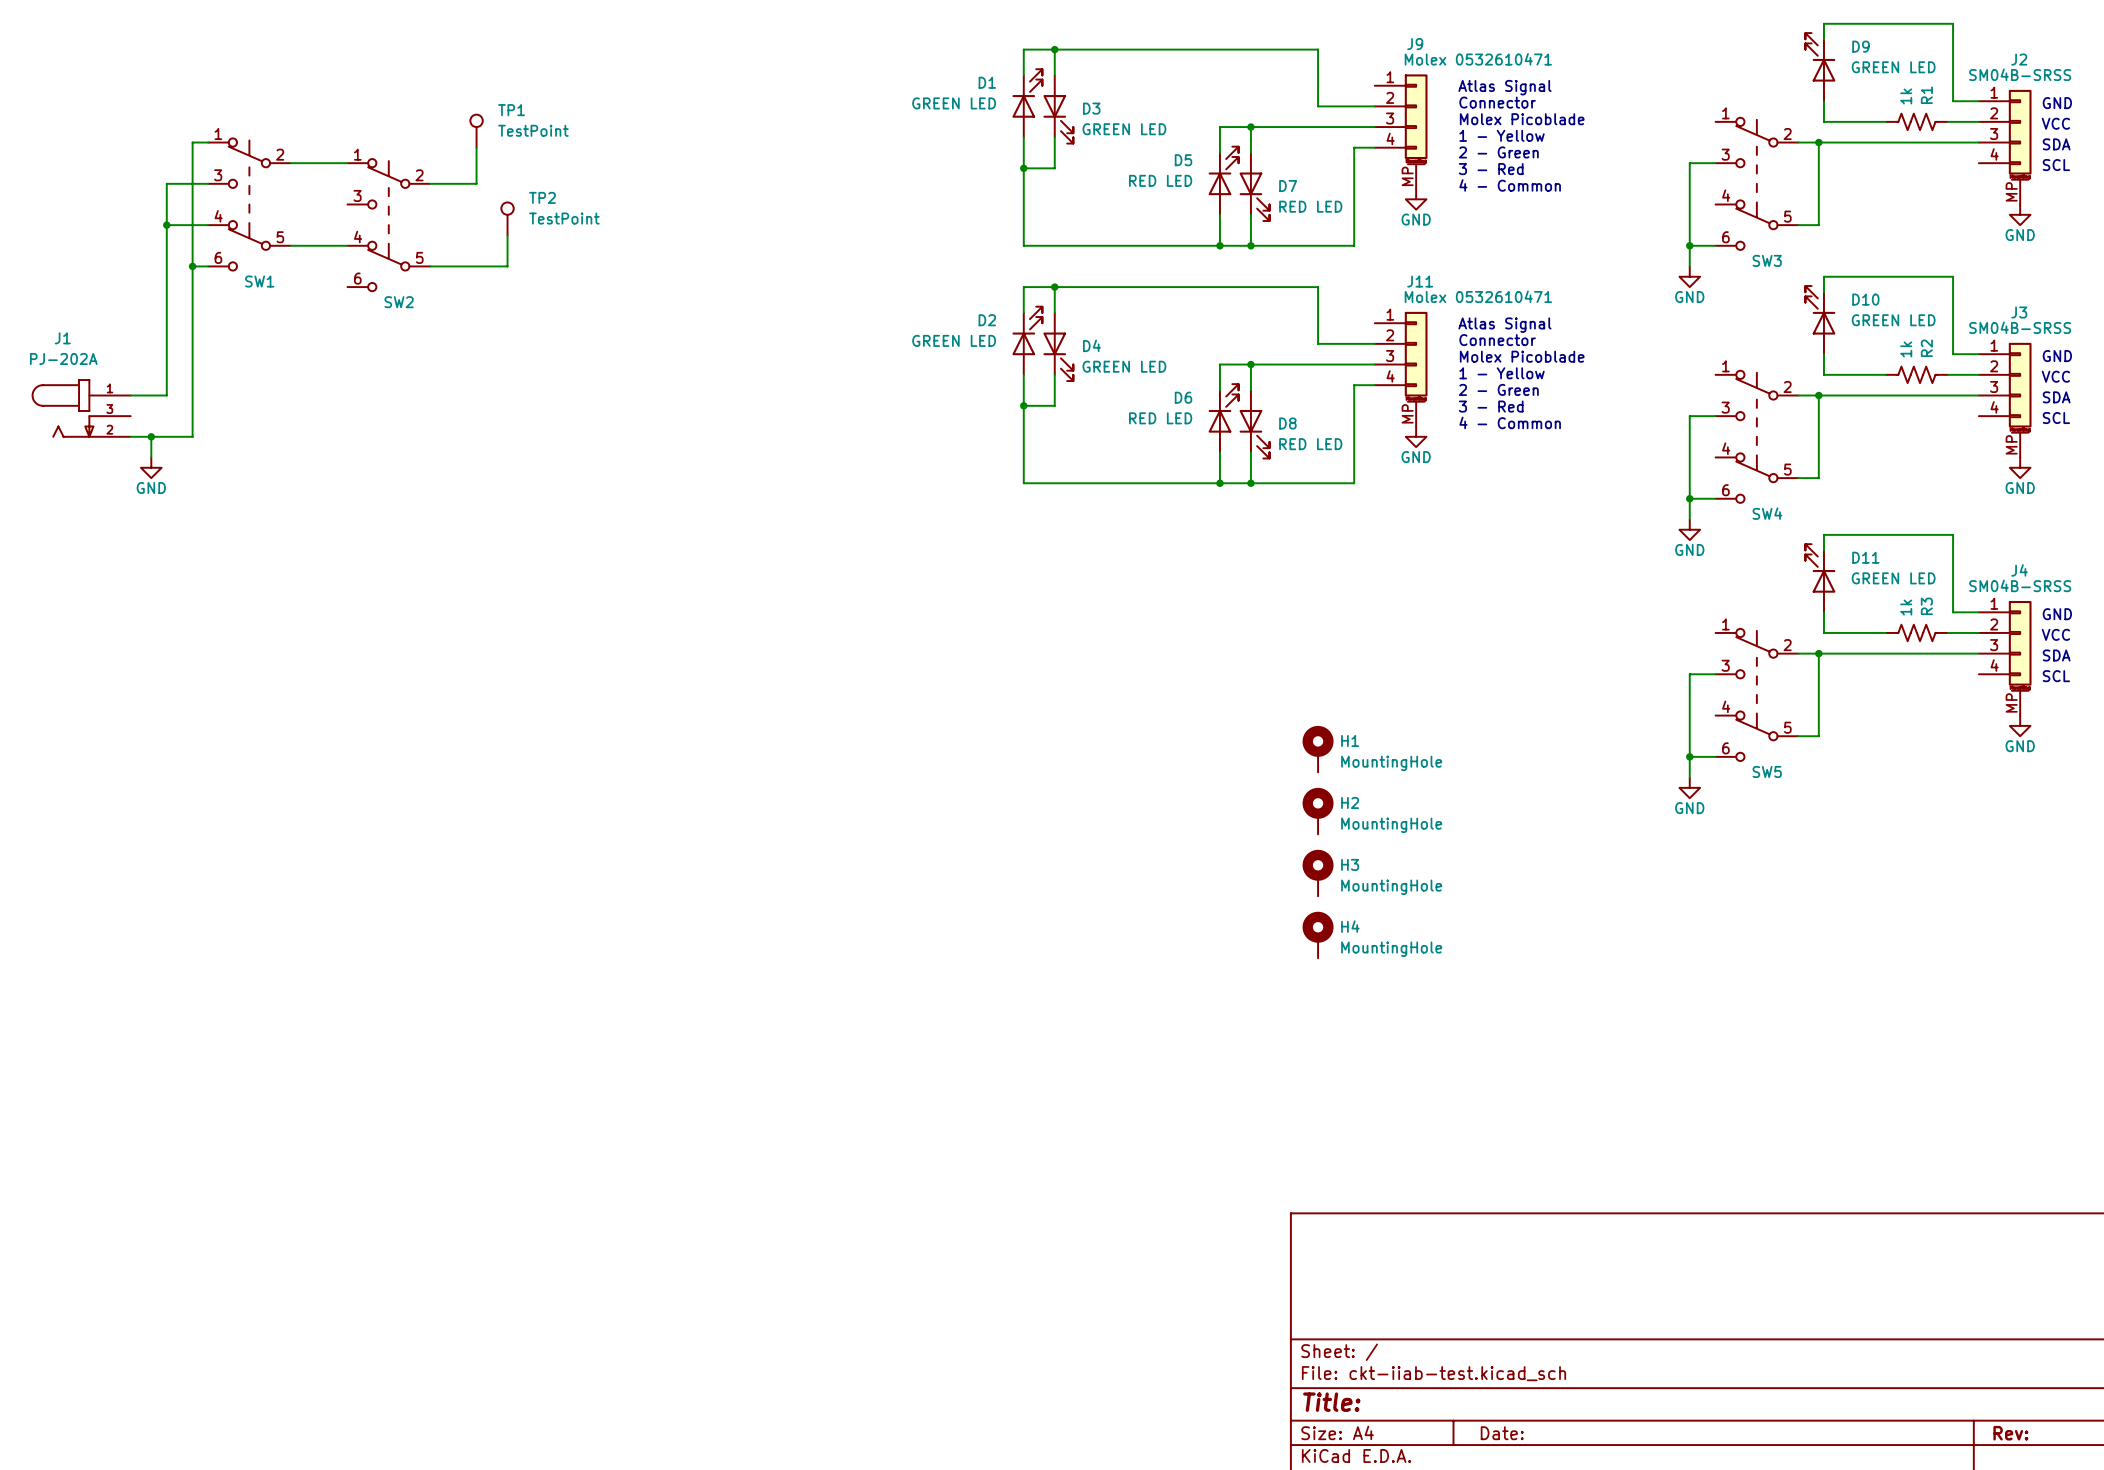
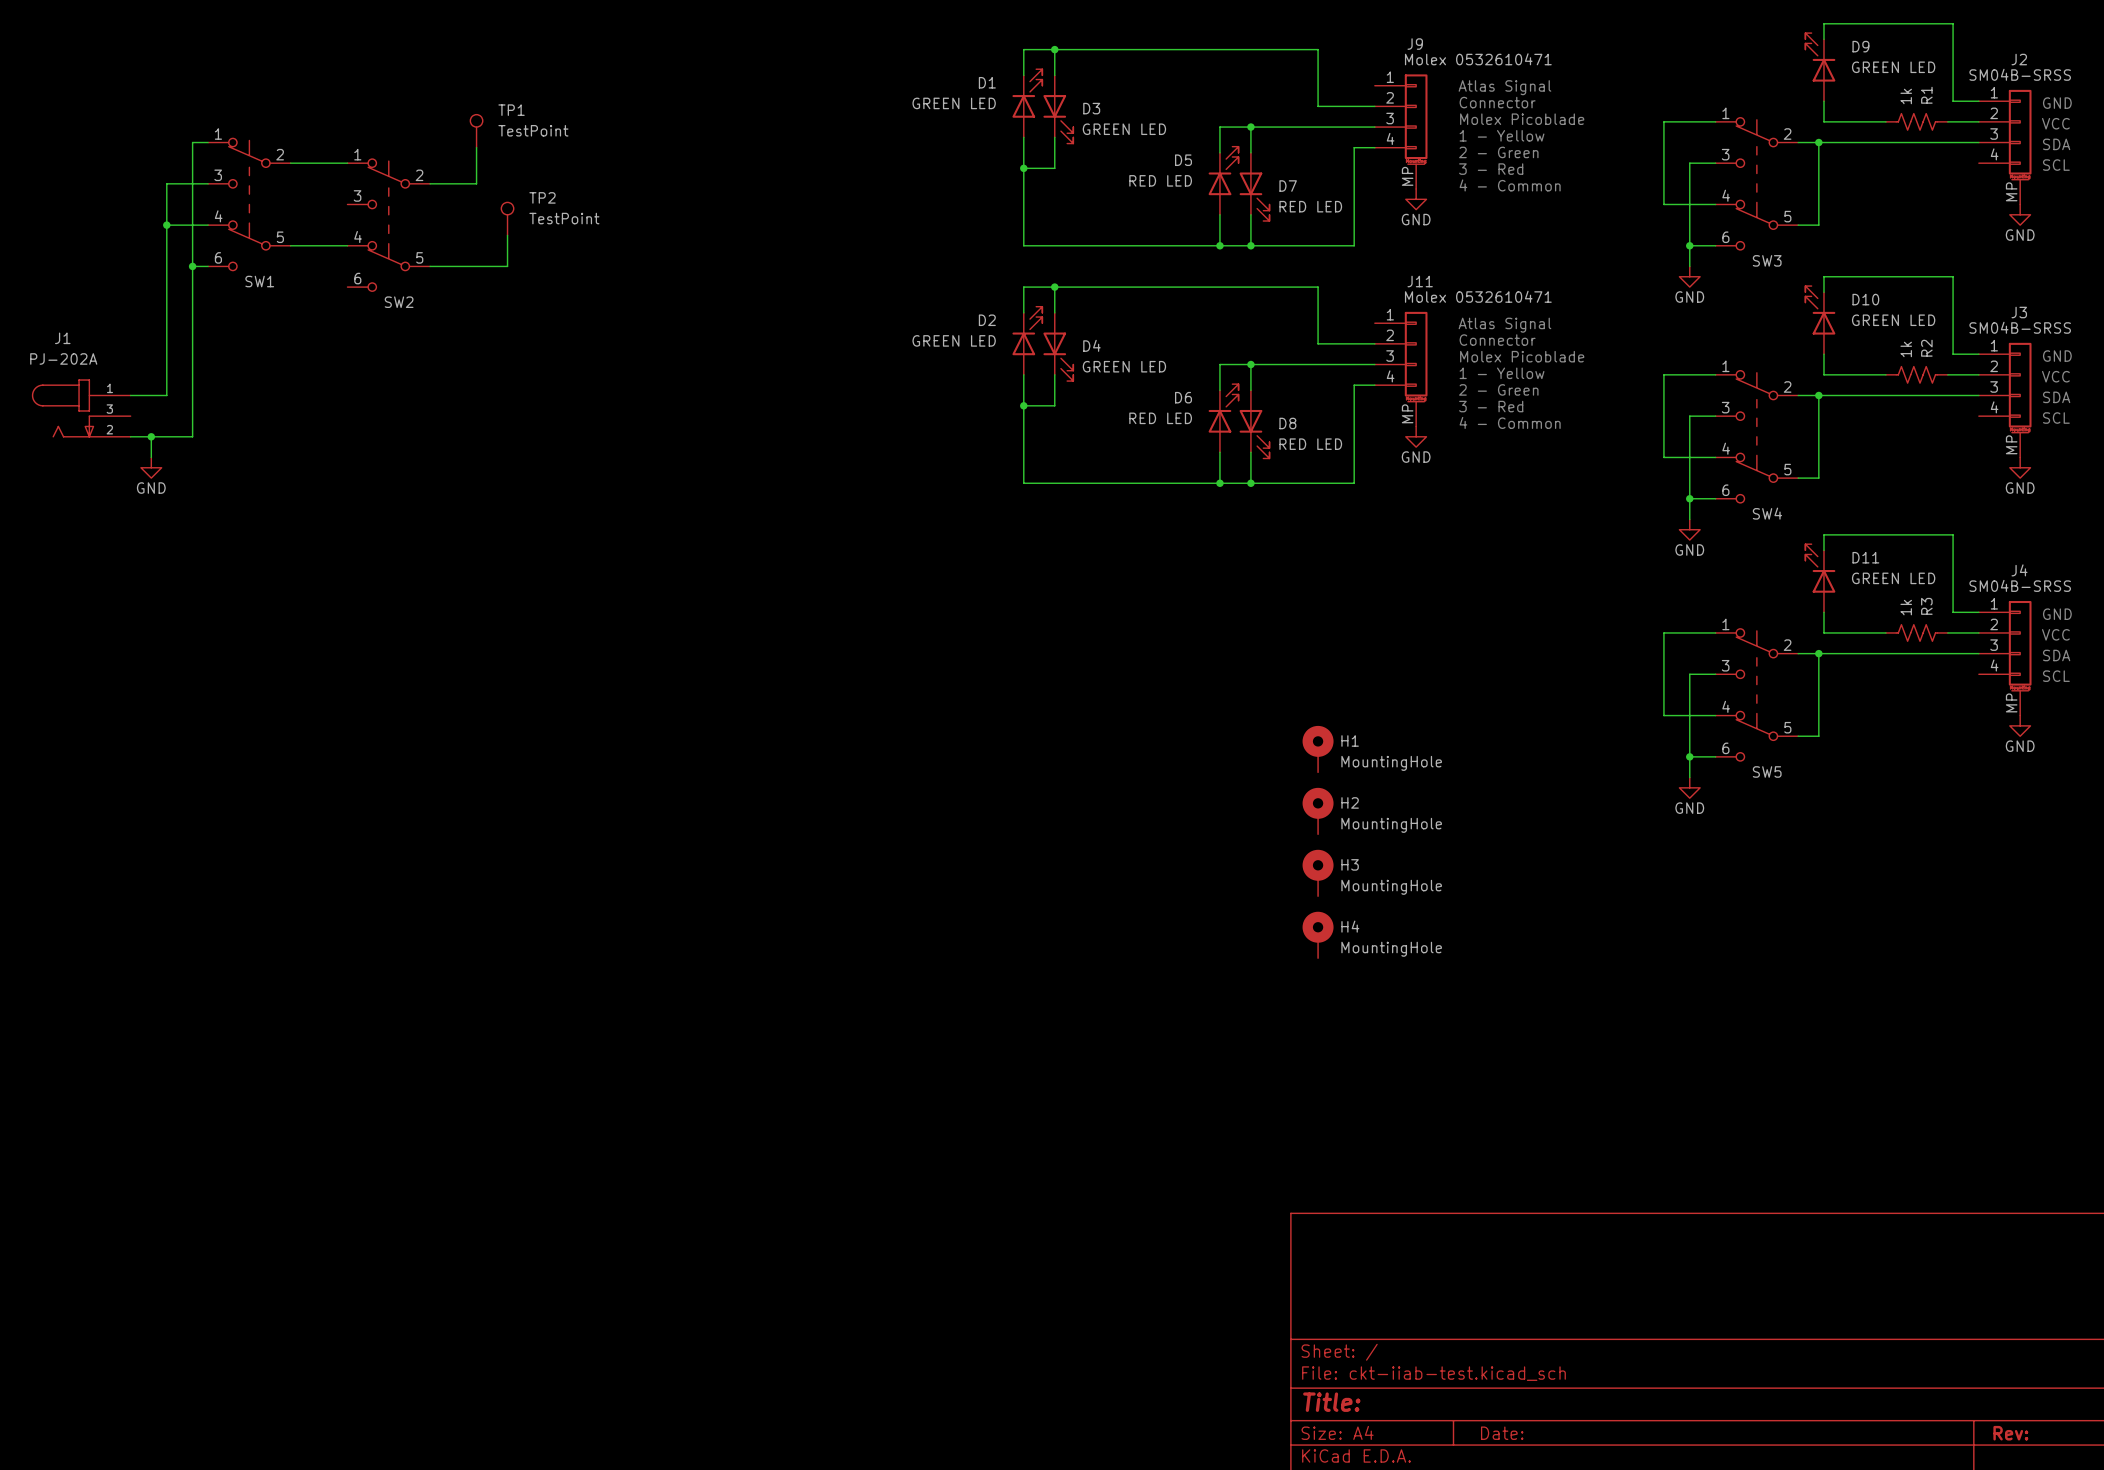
wire: none -> (1715, 121) (1663, 121) (1663, 204) (1715, 204)
wire: none -> (1715, 374) (1663, 374) (1663, 457) (1715, 457)
wire: none -> (1715, 632) (1663, 632) (1663, 715) (1715, 715)

